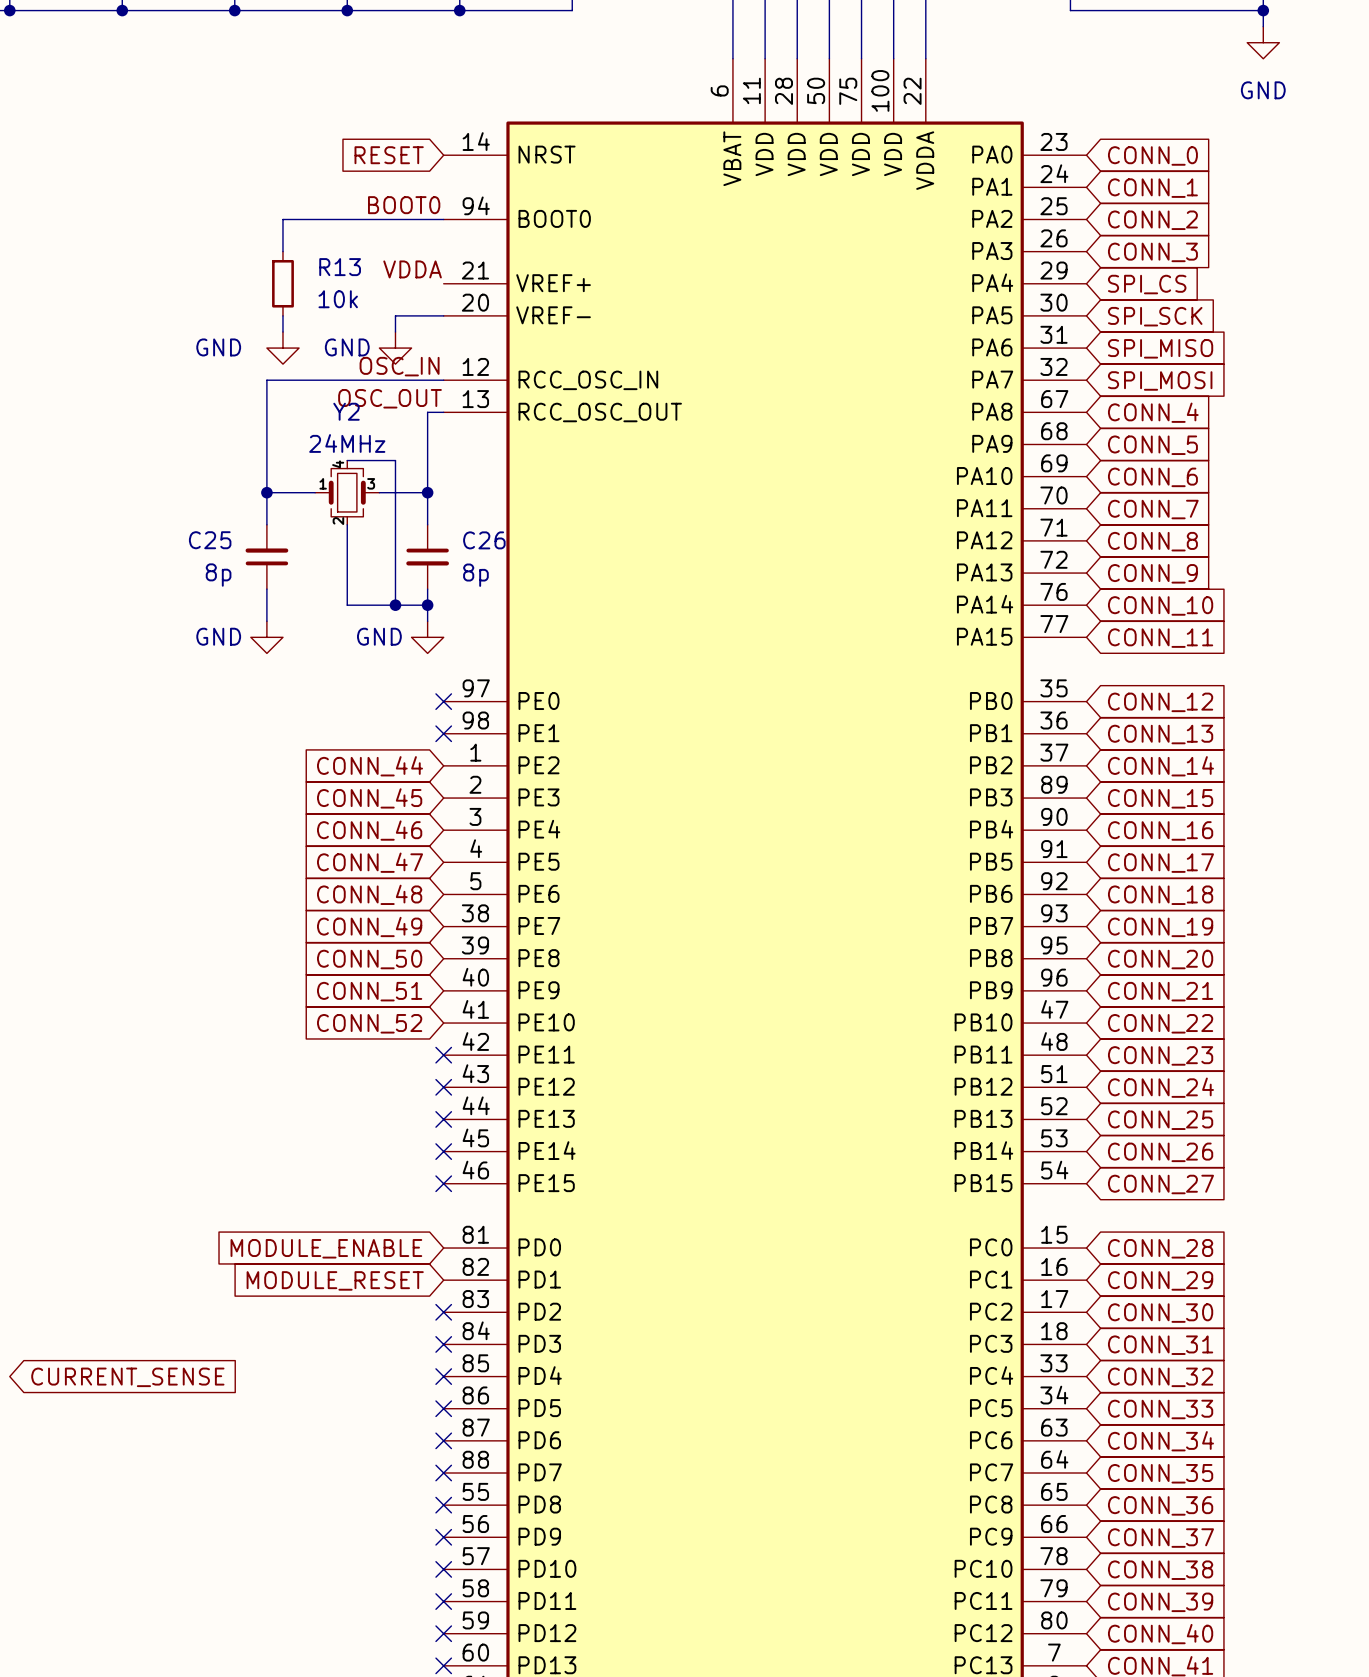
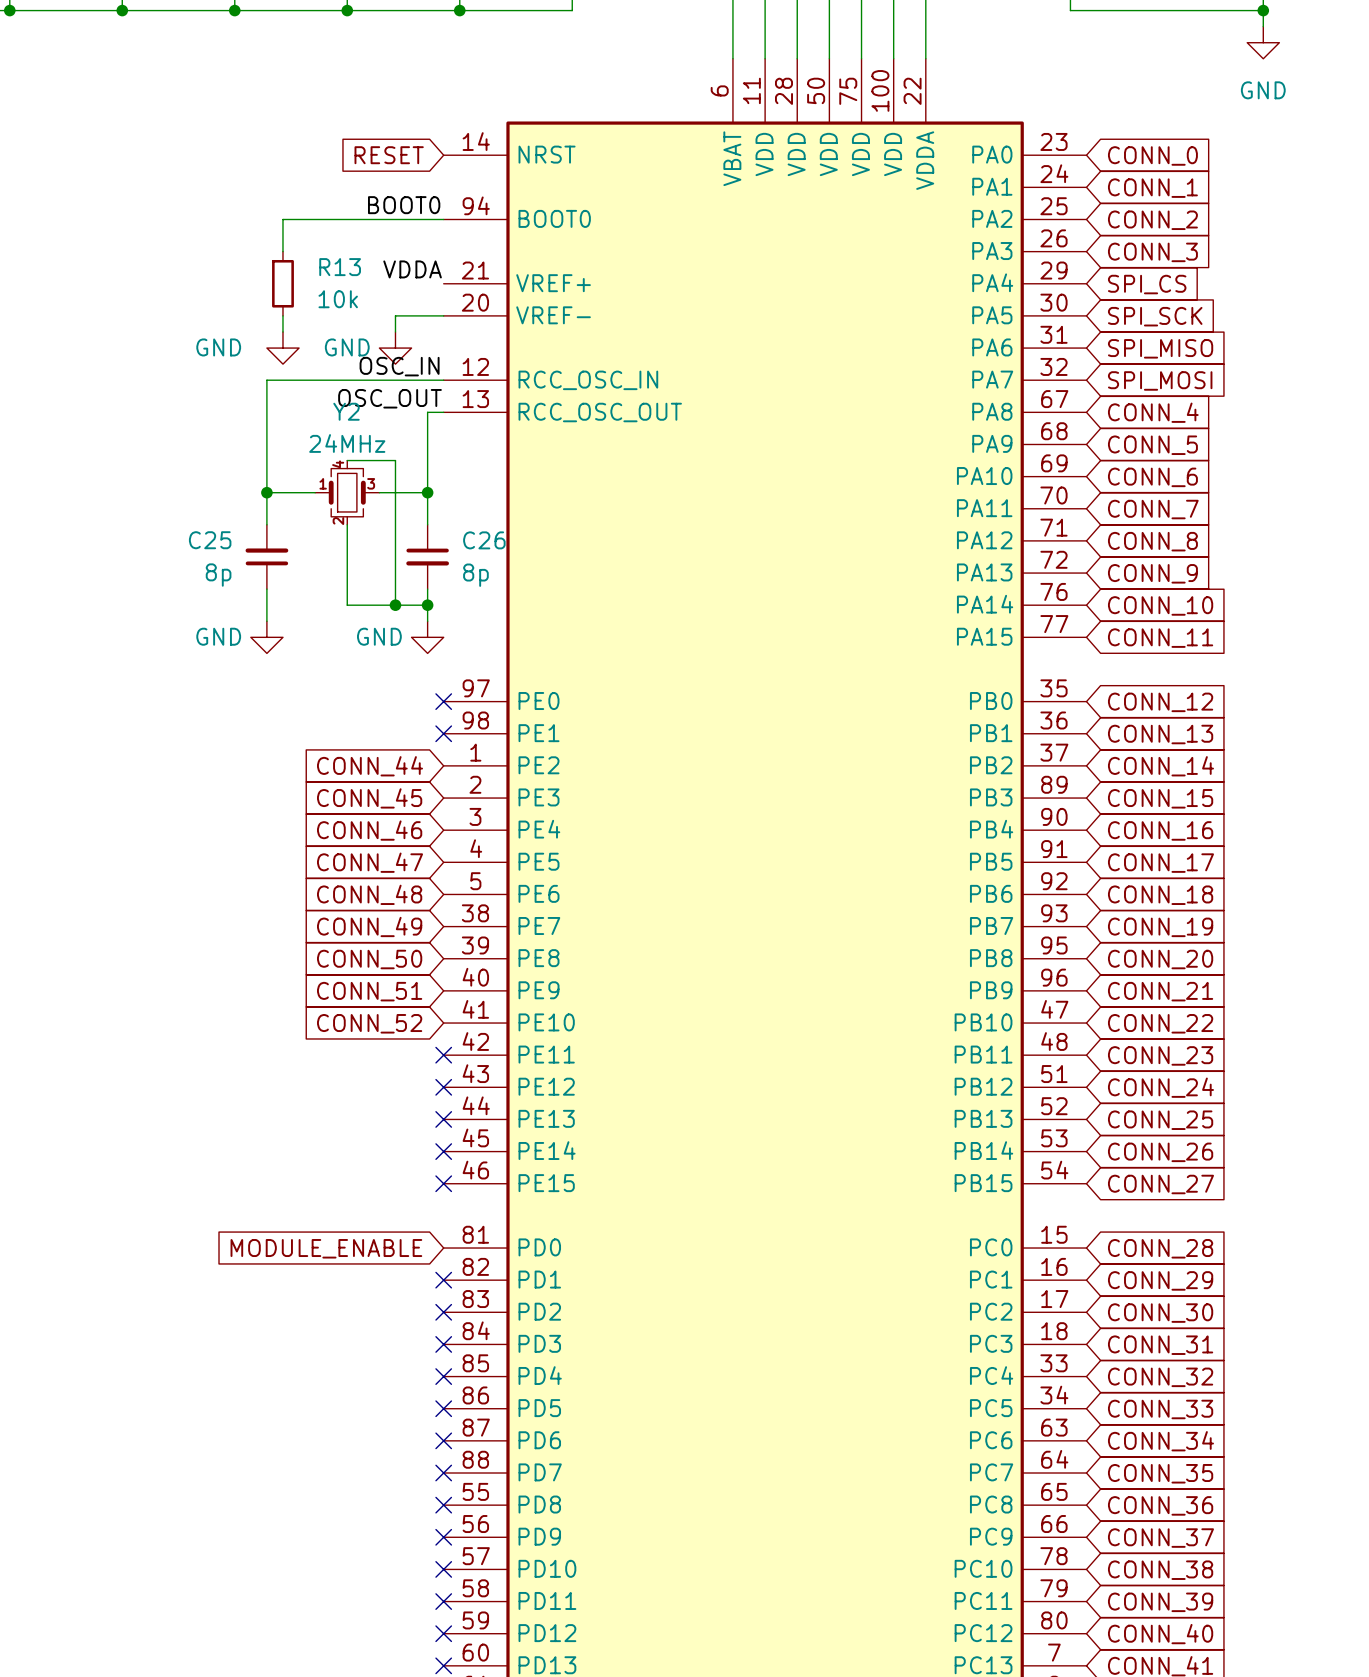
global label: MODULE_RESET (335, 1280) -> none
no-connect mark: none -> (443, 1280)
global label: CURRENT_SENSE (127, 1377) -> none

